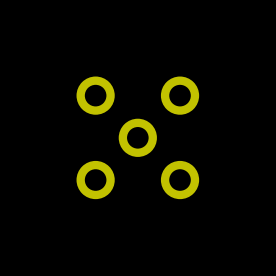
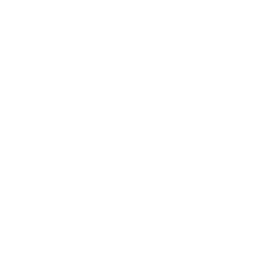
part: (137, 137) -> none

